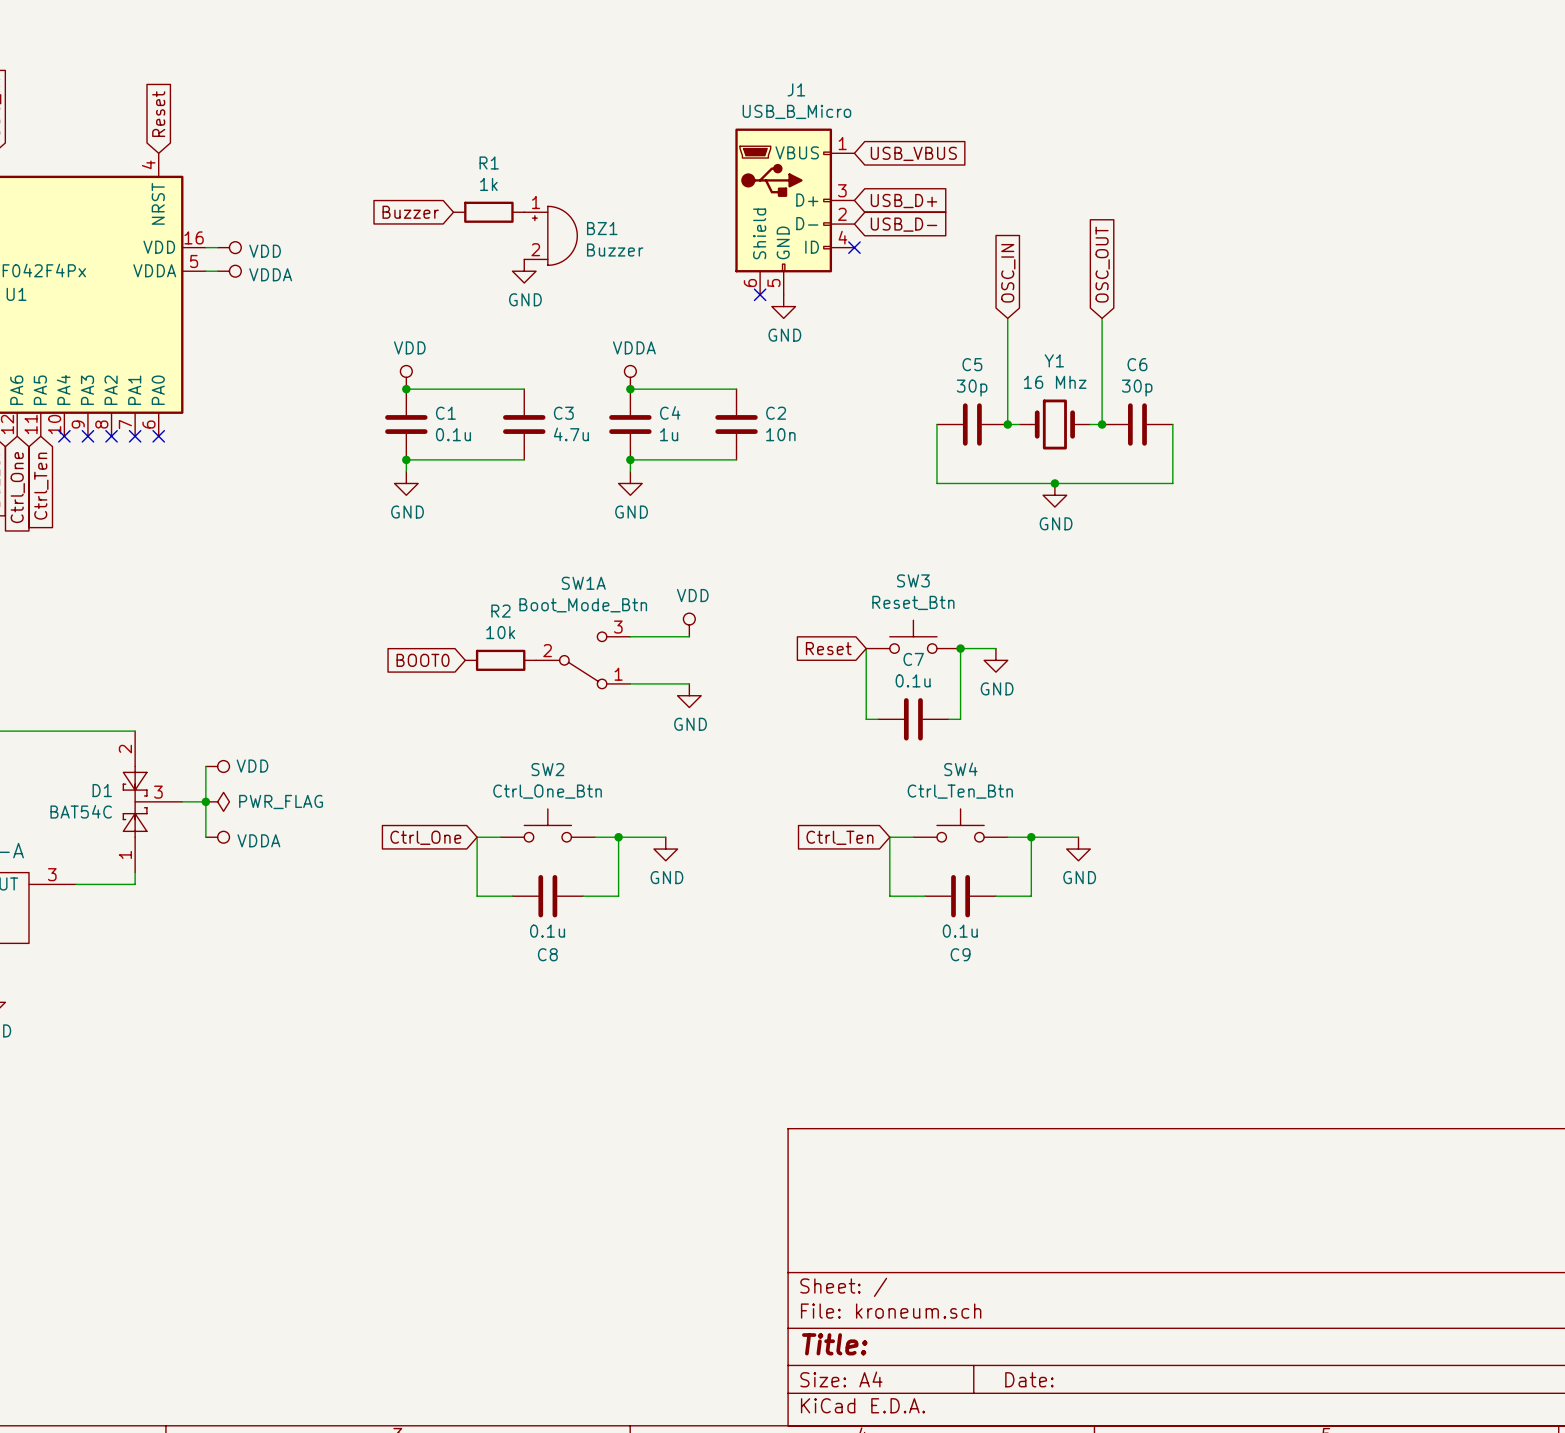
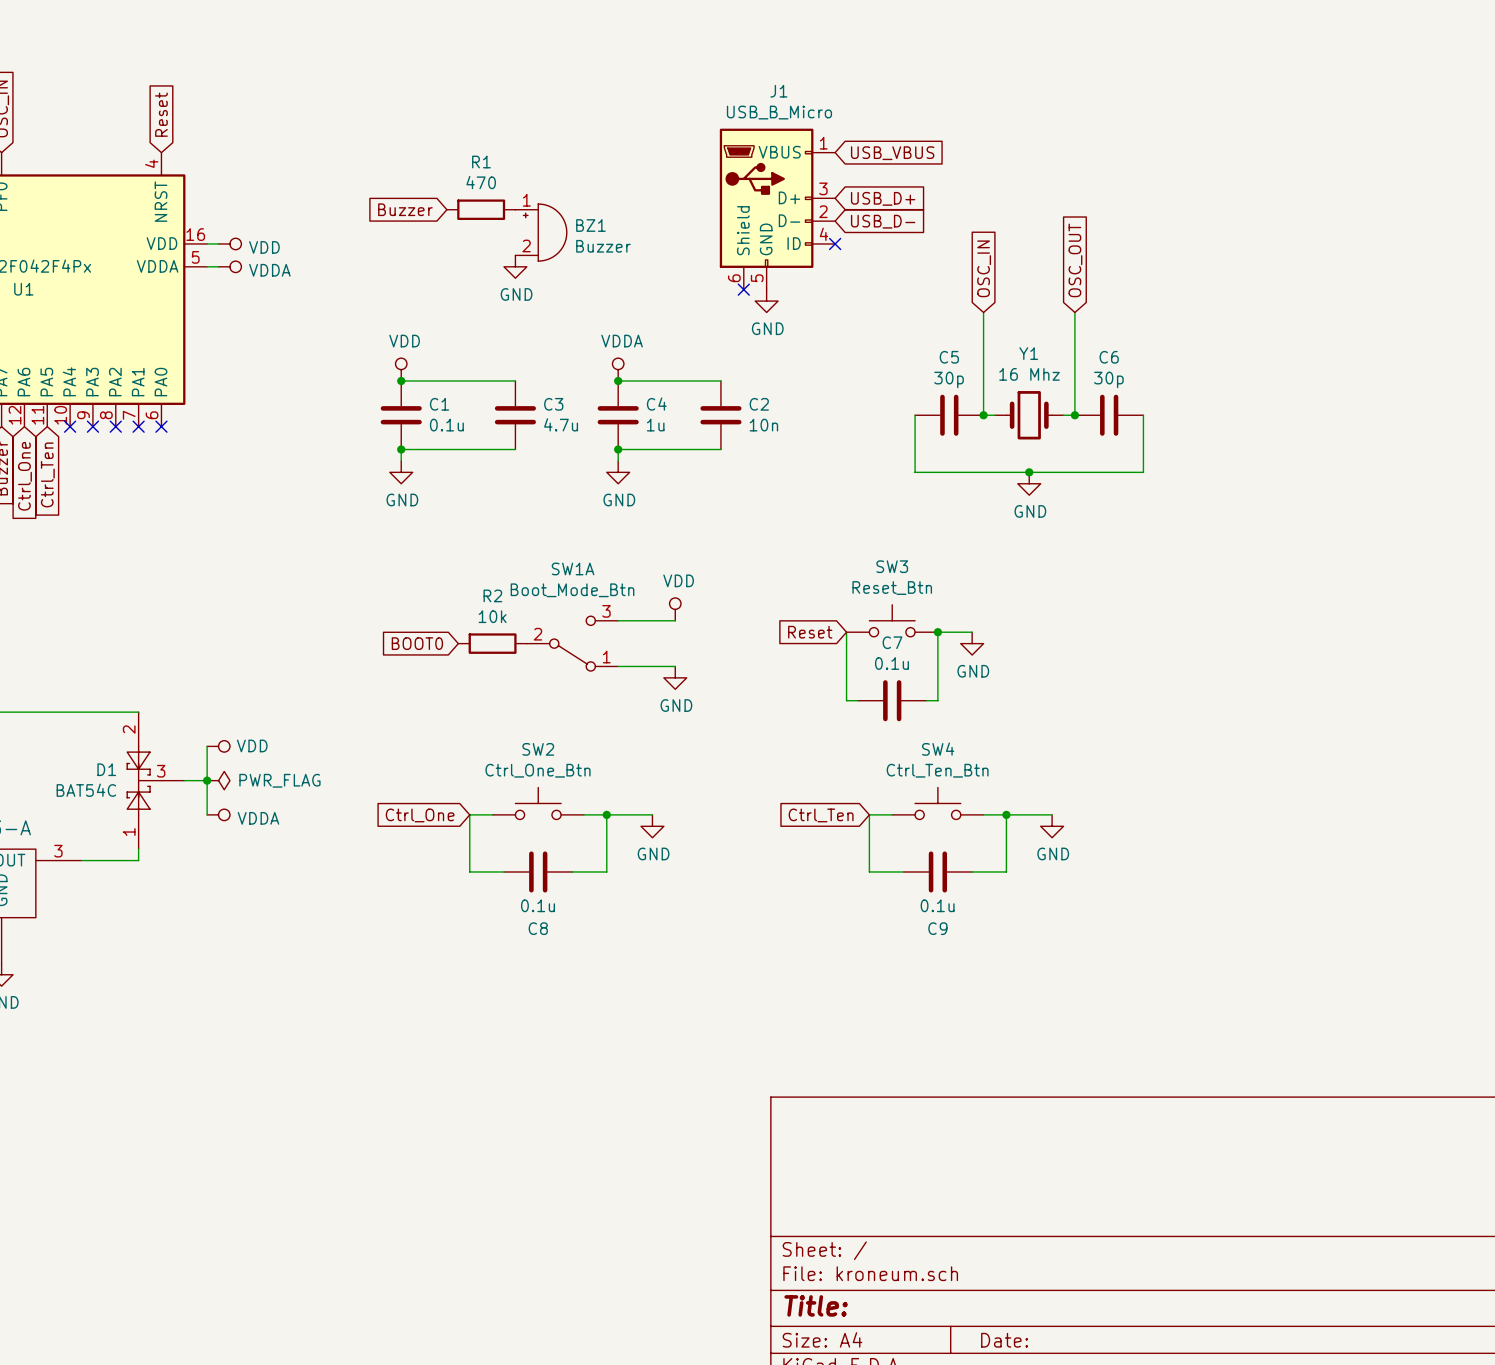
R1 value: 1k (488, 184) -> 470 (481, 182)

